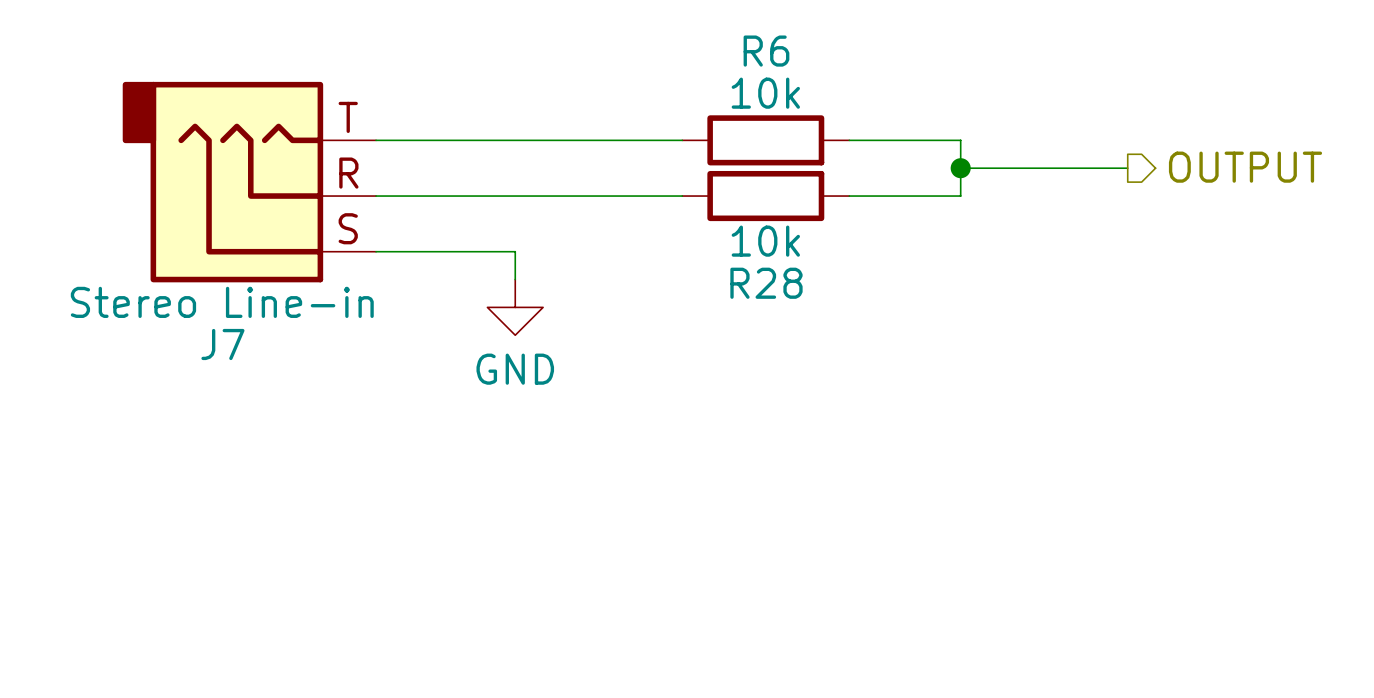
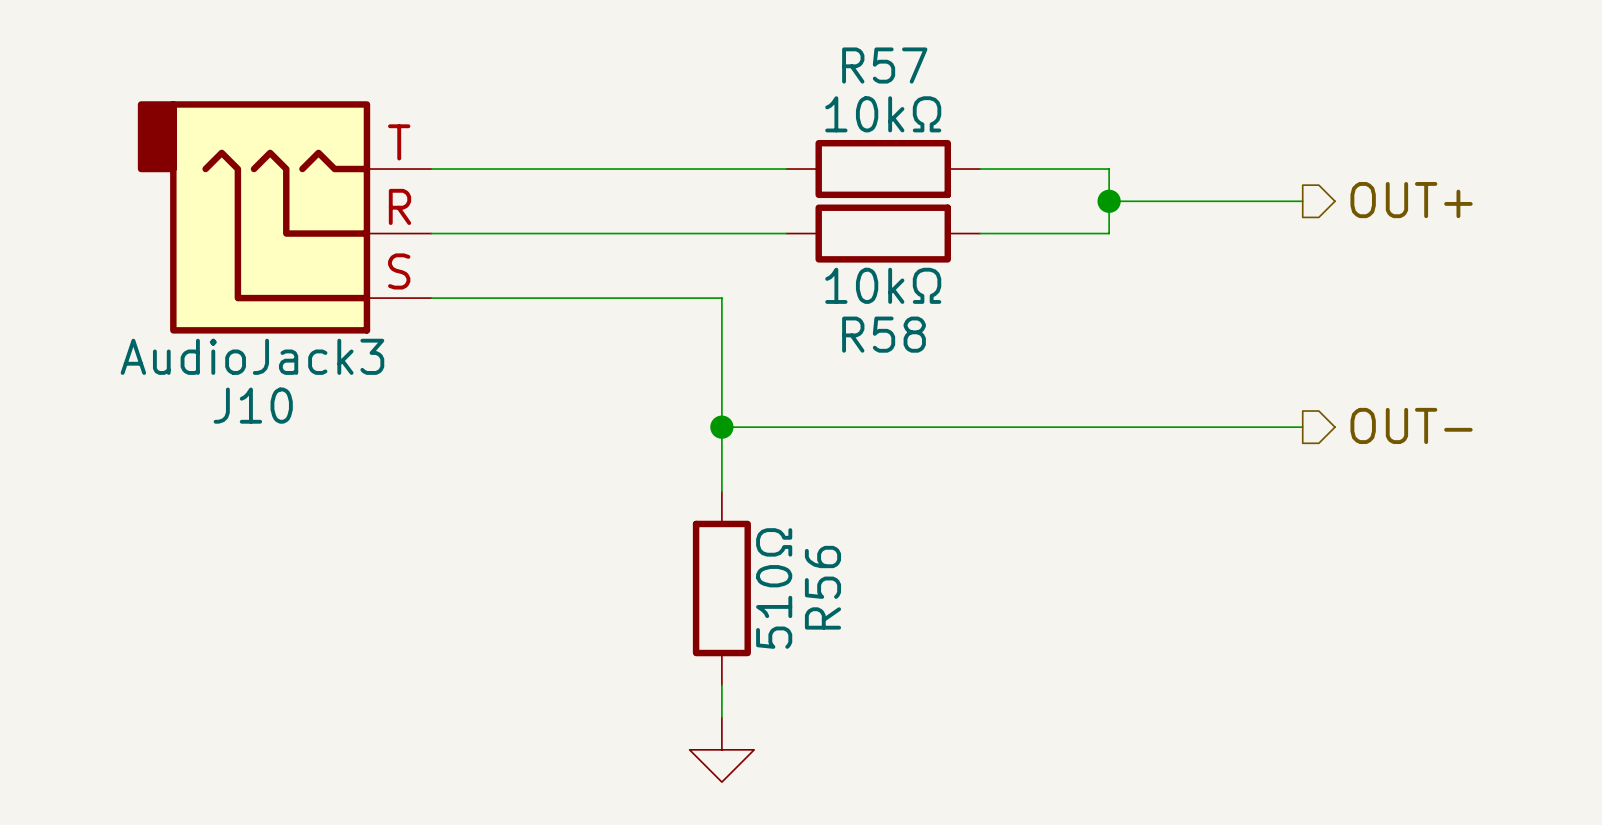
R6 name: R6 (766, 51) -> R57 (884, 65)
R6 value: 10k (765, 93) -> 10kΩ (883, 114)
hierarchical label: OUTPUT (1245, 167) -> OUT+ (1411, 200)
R28 value: 10k (765, 241) -> 10kΩ (883, 285)
wire: (515, 251) (515, 279) -> (592, 298) (721, 298) (721, 491)
R28 name: R28 (766, 283) -> R58 (884, 334)
J7 value: Stereo Line-in (222, 302) -> AudioJack3 (252, 356)
power symbol: GND (515, 307) -> none
J7 name: J7 (222, 344) -> J10 (253, 405)
hierarchical label: none -> OUT- (1411, 425)
wire: none -> (721, 427) (1302, 427)
junction: none -> (721, 427)
R56: none -> 510Ω (721, 588)
wire: none -> (721, 685) (721, 717)
power symbol: none -> (721, 749)

